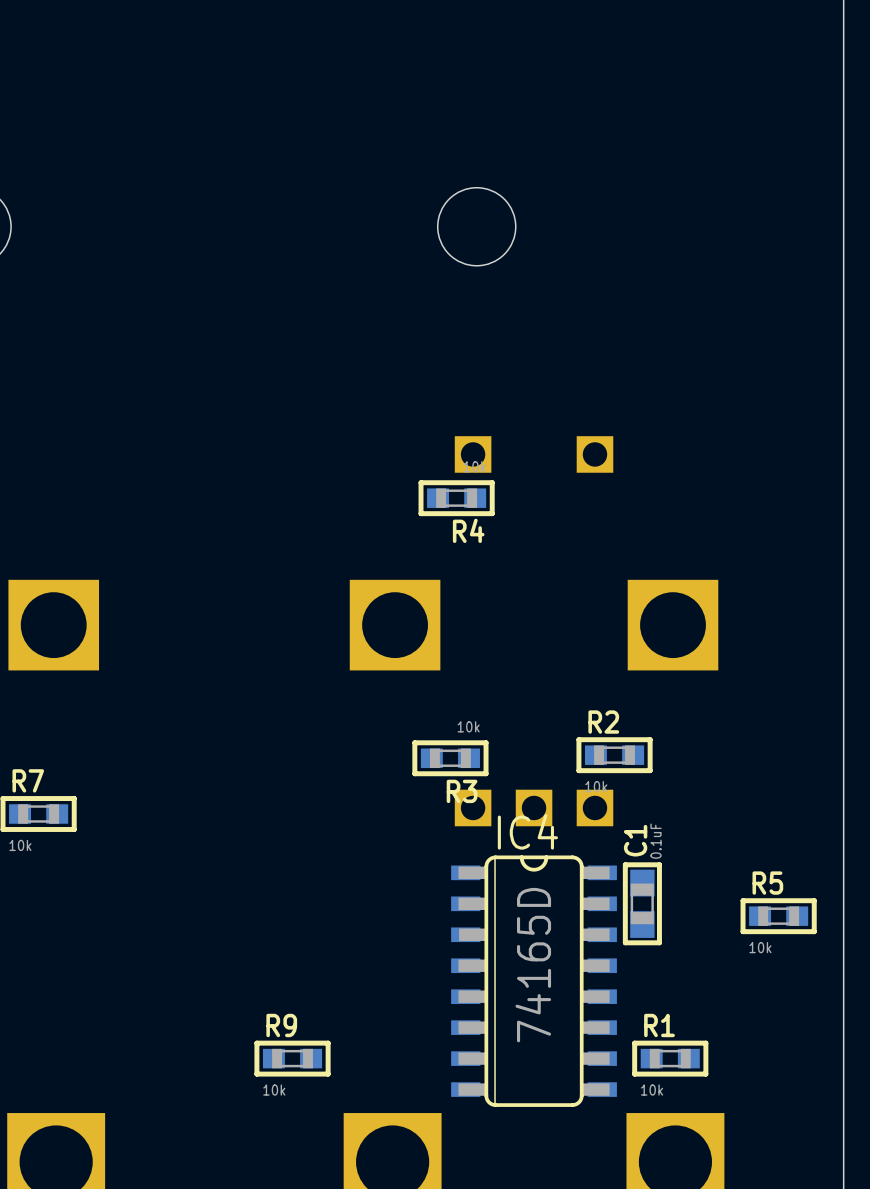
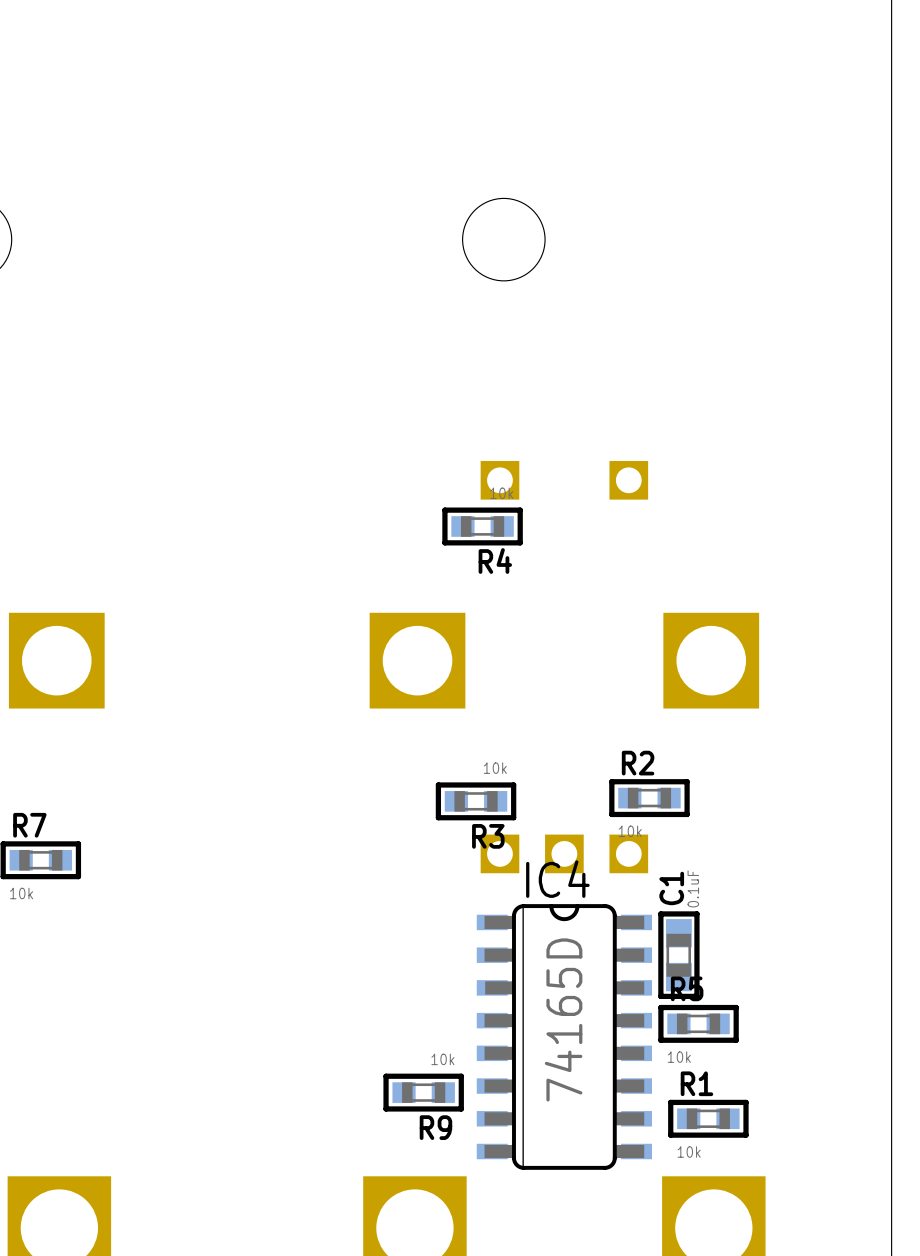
R5 position: (778, 916) -> (698, 1023)
R9 name position: R9 (281, 1025) -> R9 (435, 1127)
R9 position: (292, 1058) -> (423, 1092)
R9 value position: 10k (274, 1090) -> 10k (442, 1059)

